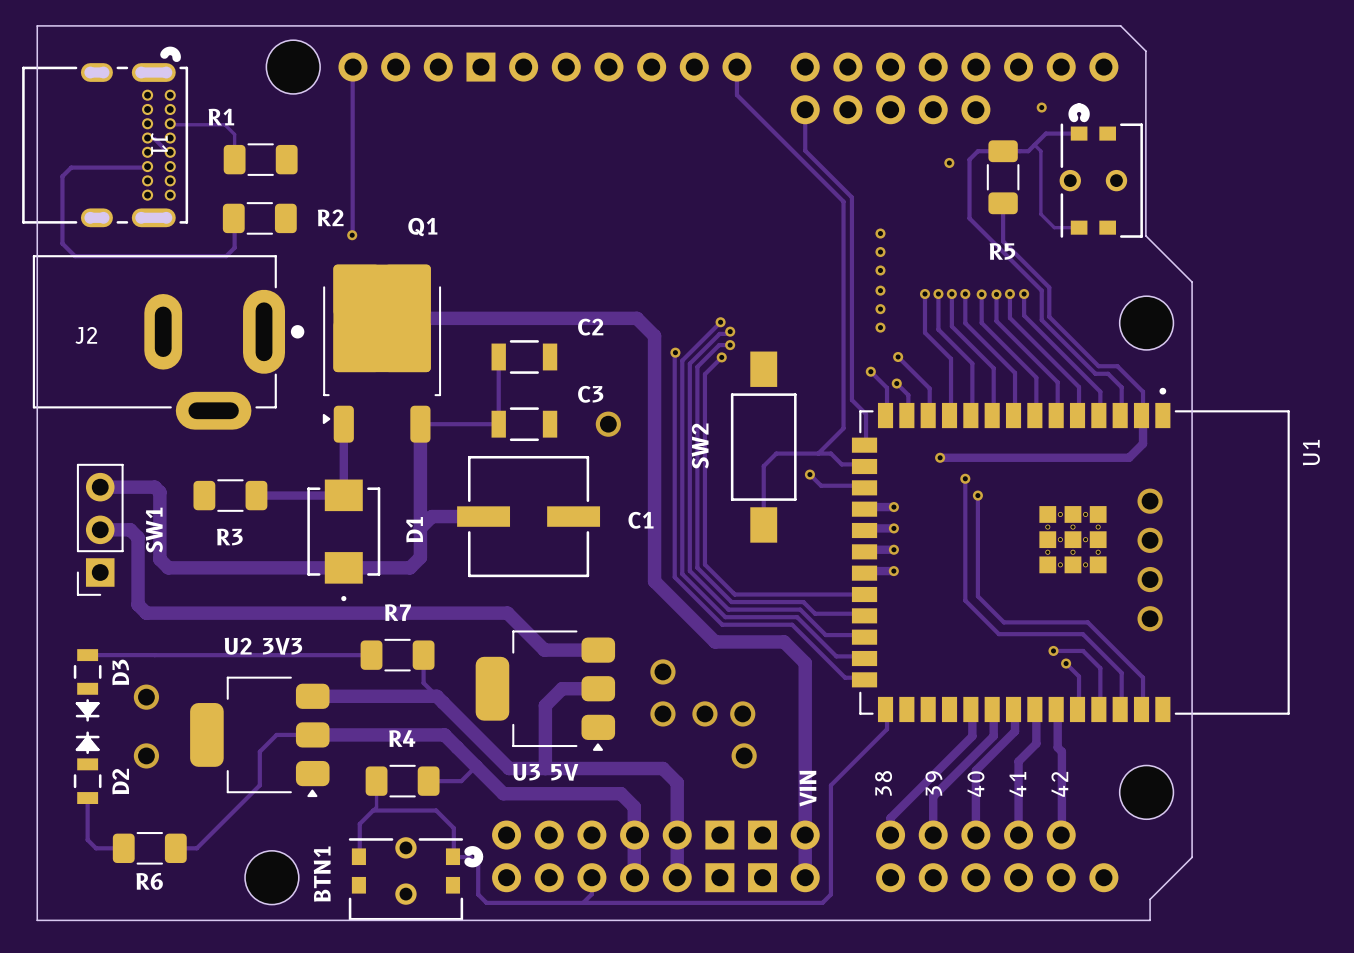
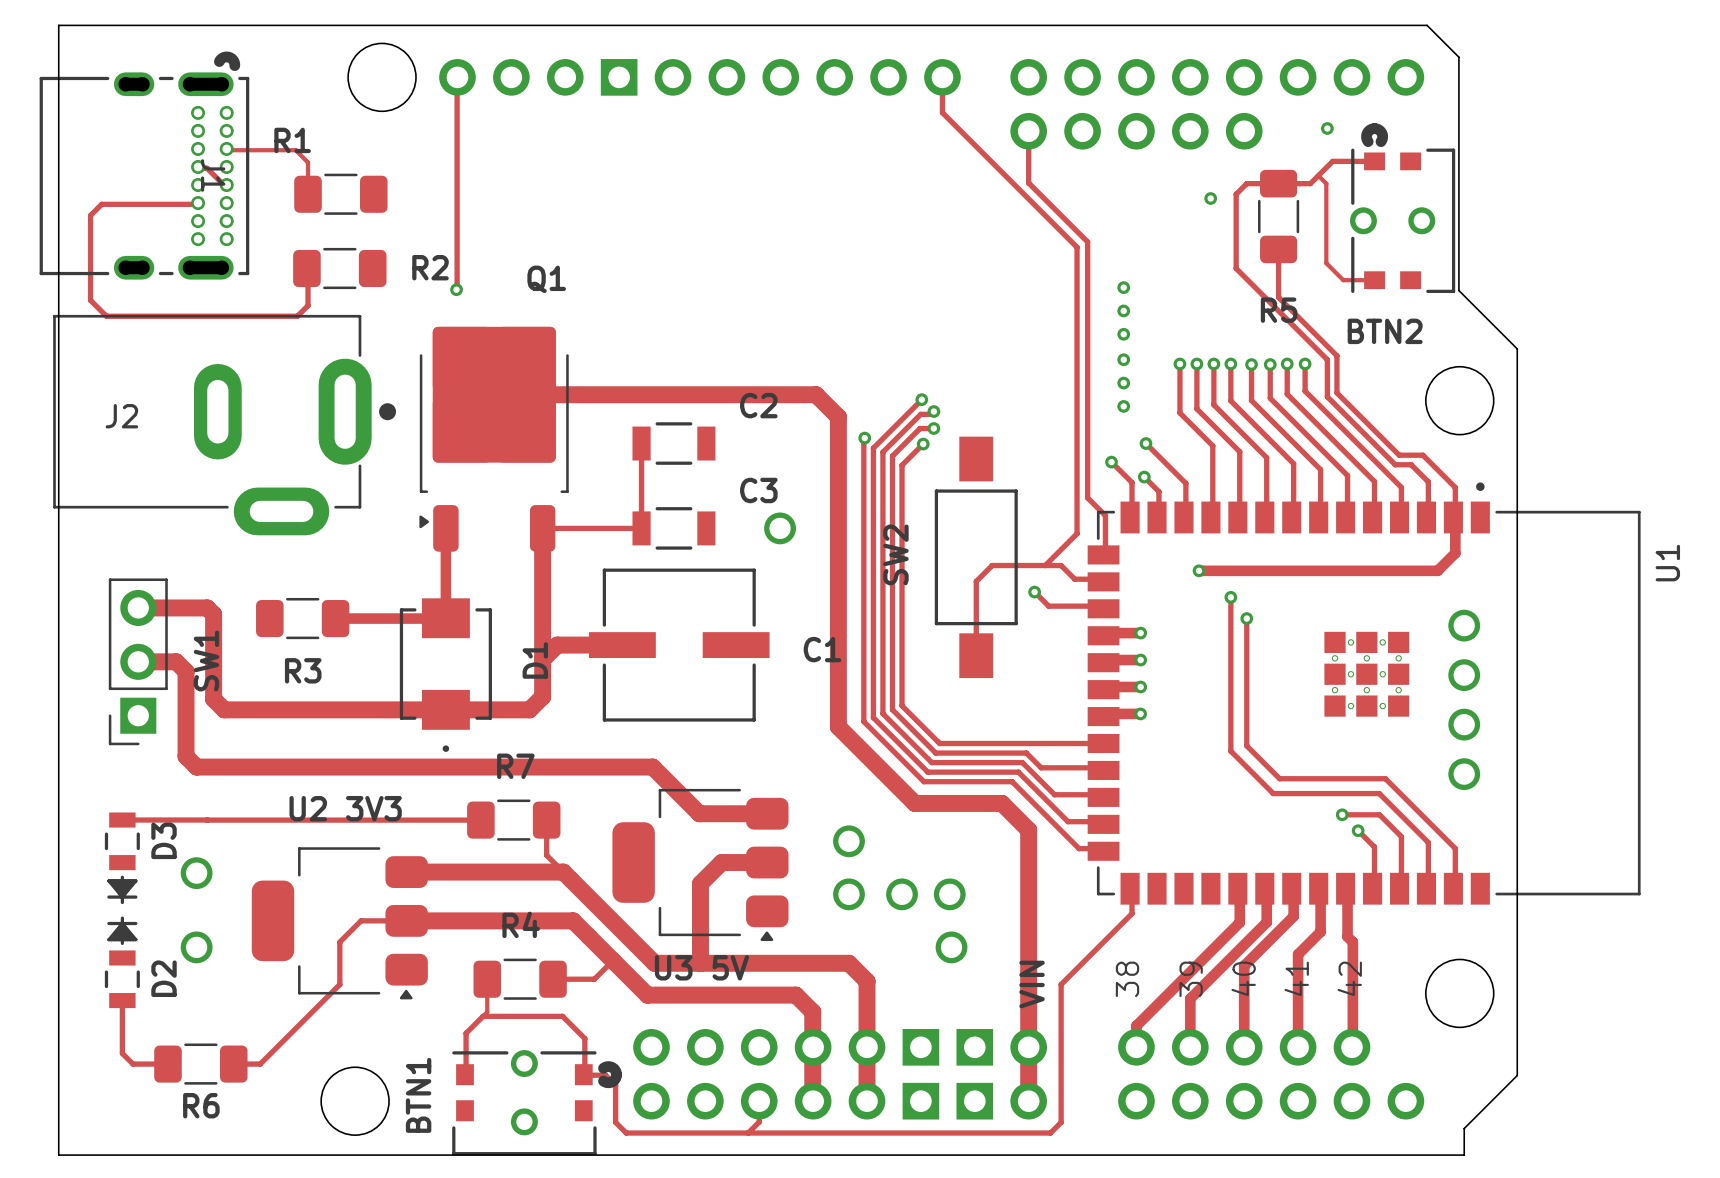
BTN2 name: none -> BTN2 (1385, 331)

